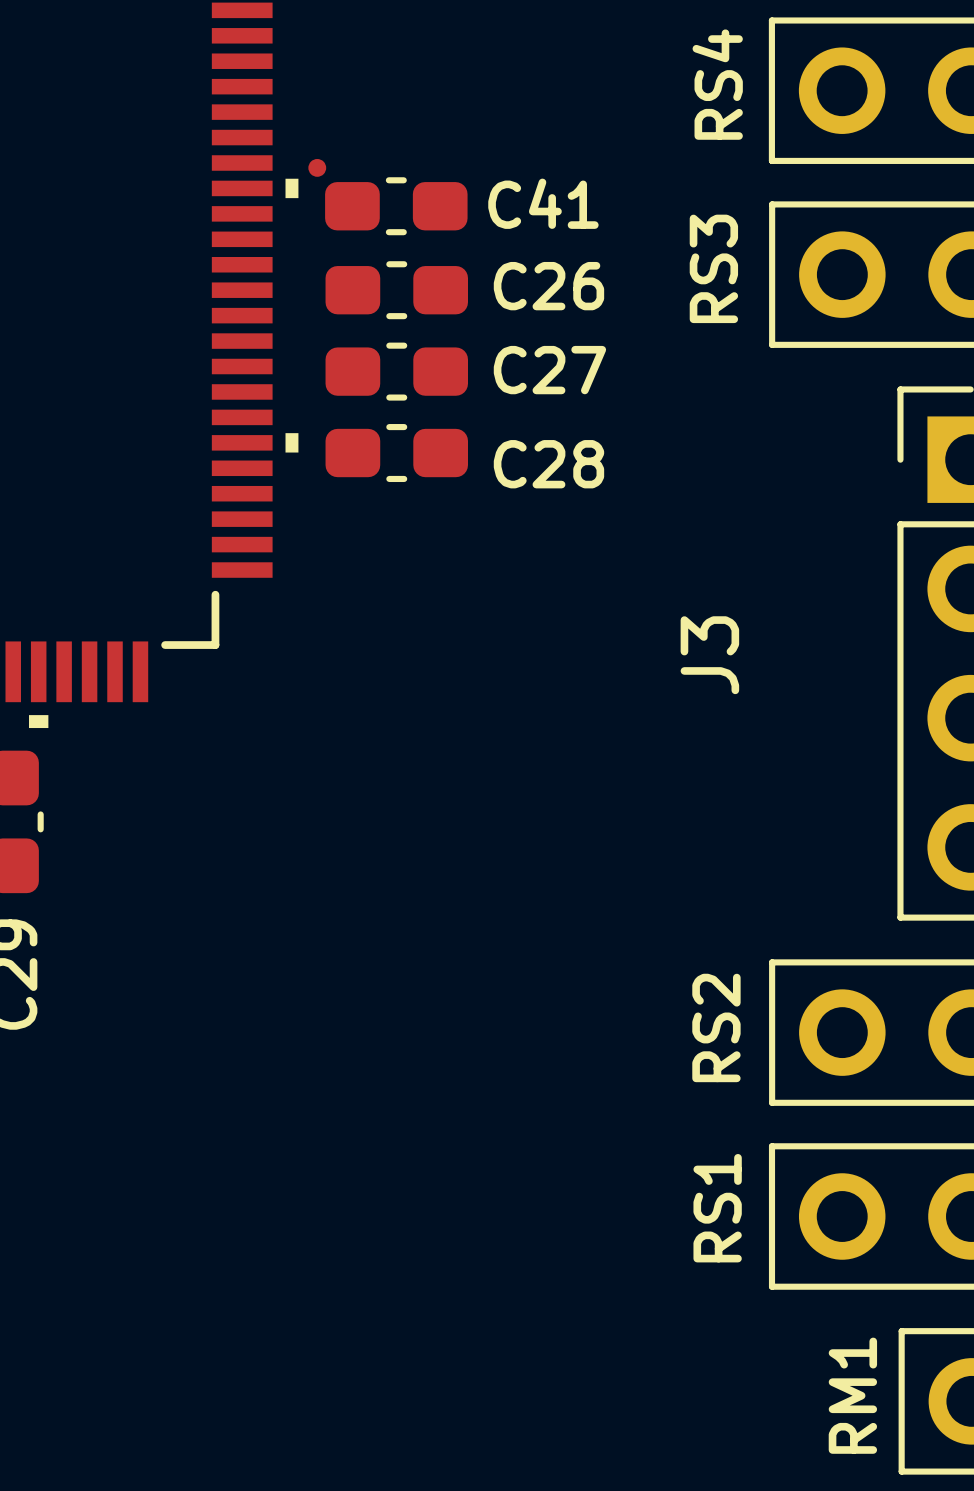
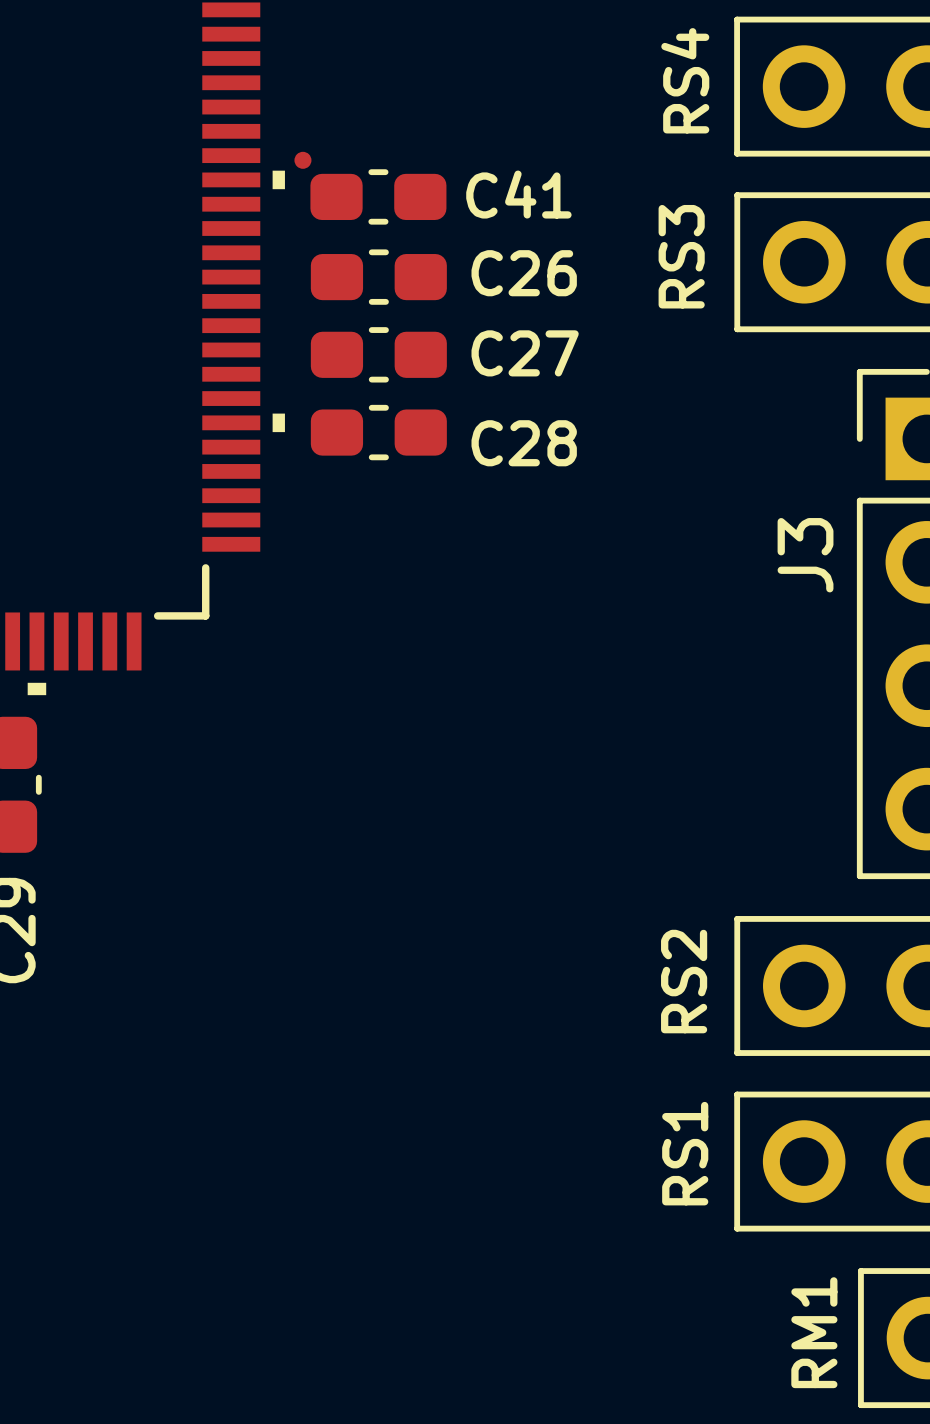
J3 name position: J3 (709, 655) -> J3 (805, 555)

